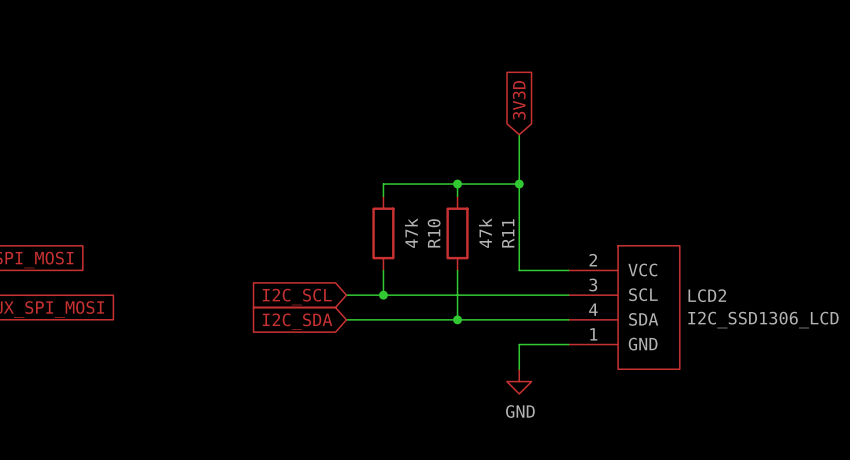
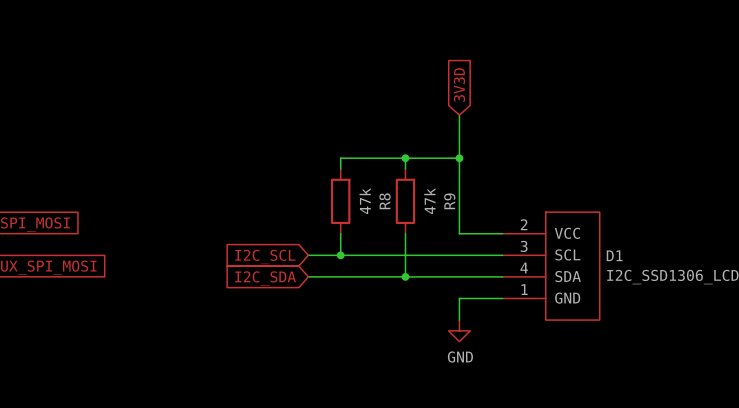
R10 name: R10 (434, 233) -> R8 (385, 201)
R11 name: R11 (508, 233) -> R9 (449, 201)
LCD2 name: LCD2 (707, 295) -> D1 (614, 255)

